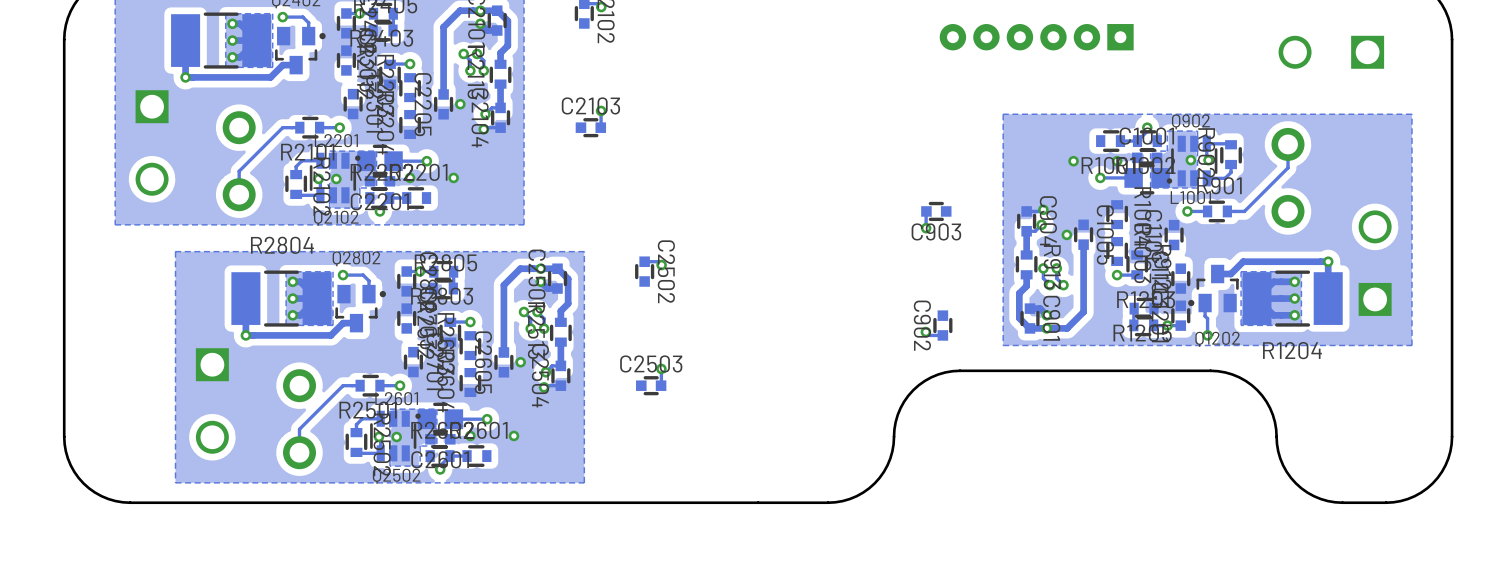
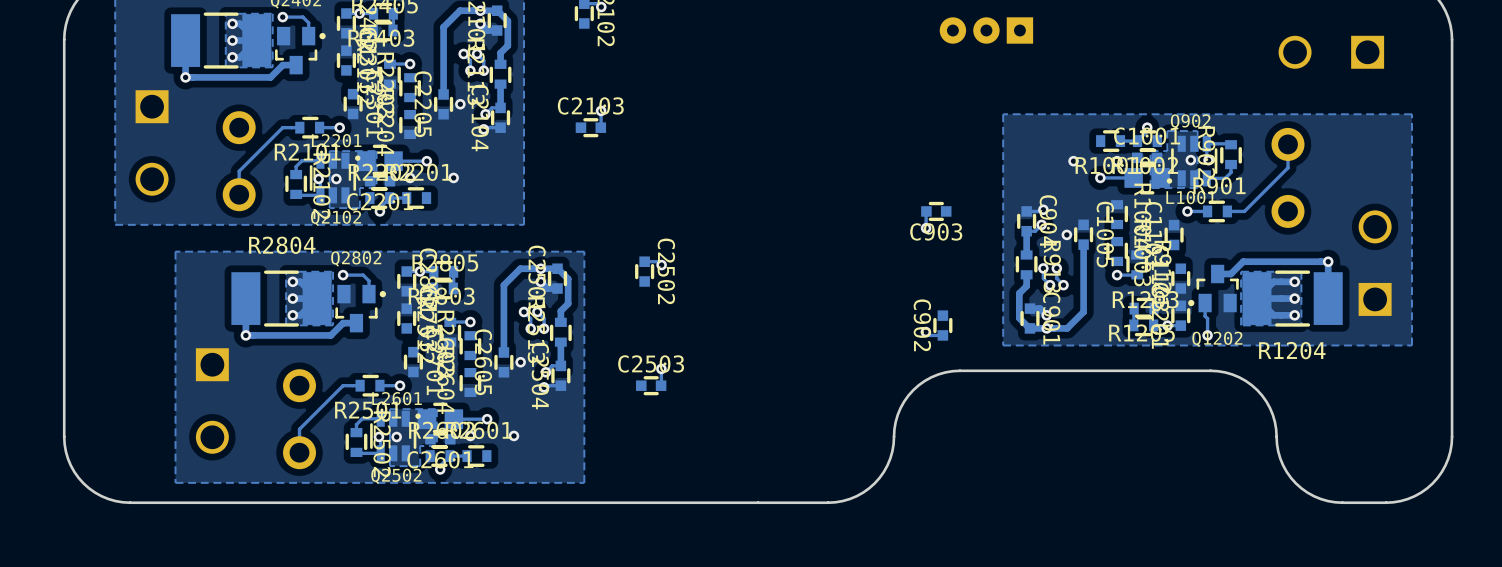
part: none -> (986, 30)
part: (1036, 37) -> none

